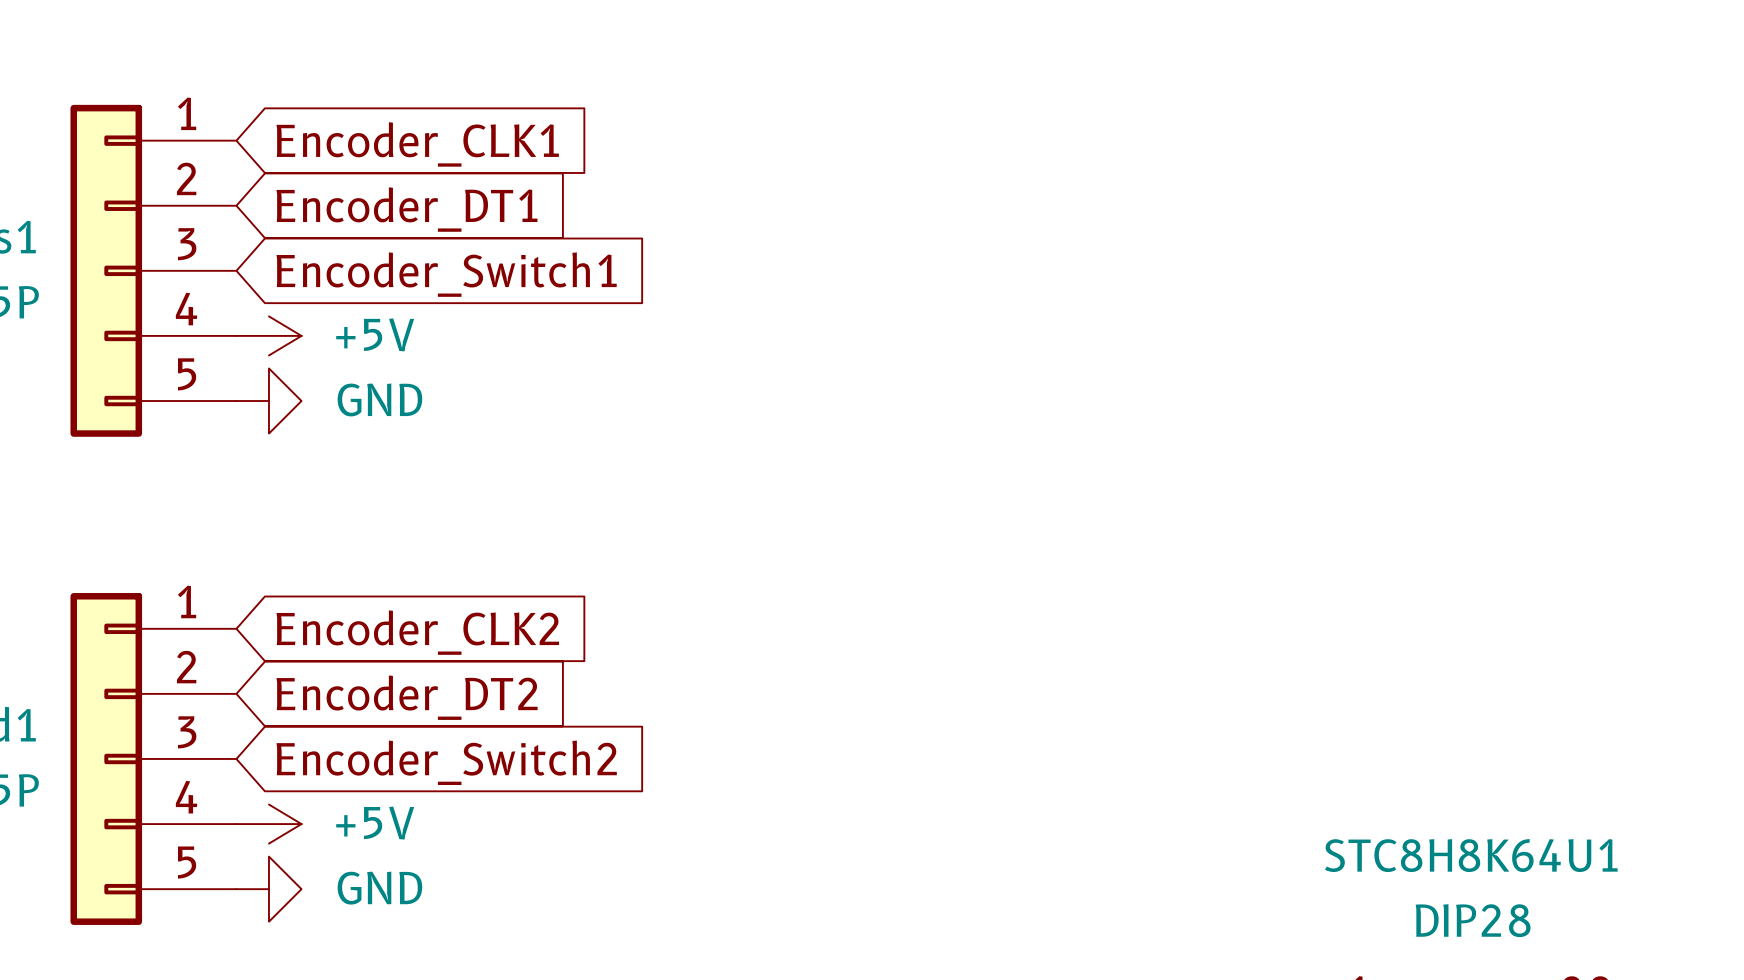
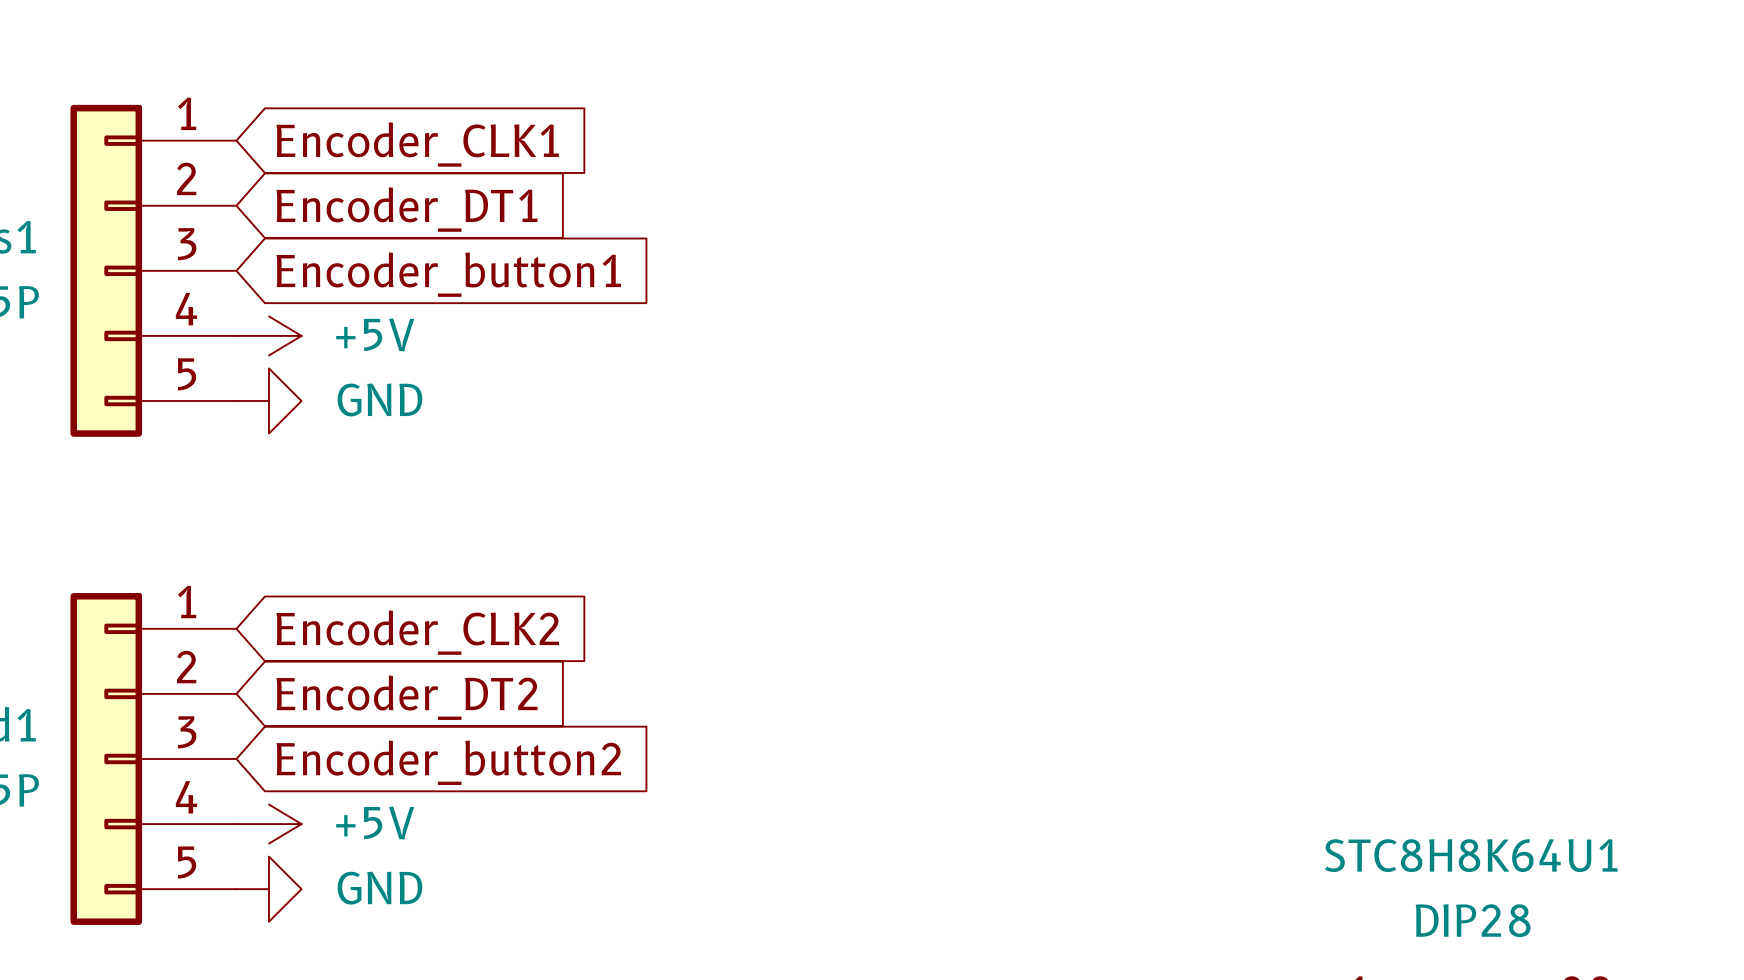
global label: Encoder_Switch1 (446, 274) -> Encoder_button1 (448, 274)
global label: Encoder_Switch2 (446, 762) -> Encoder_button2 (448, 762)

